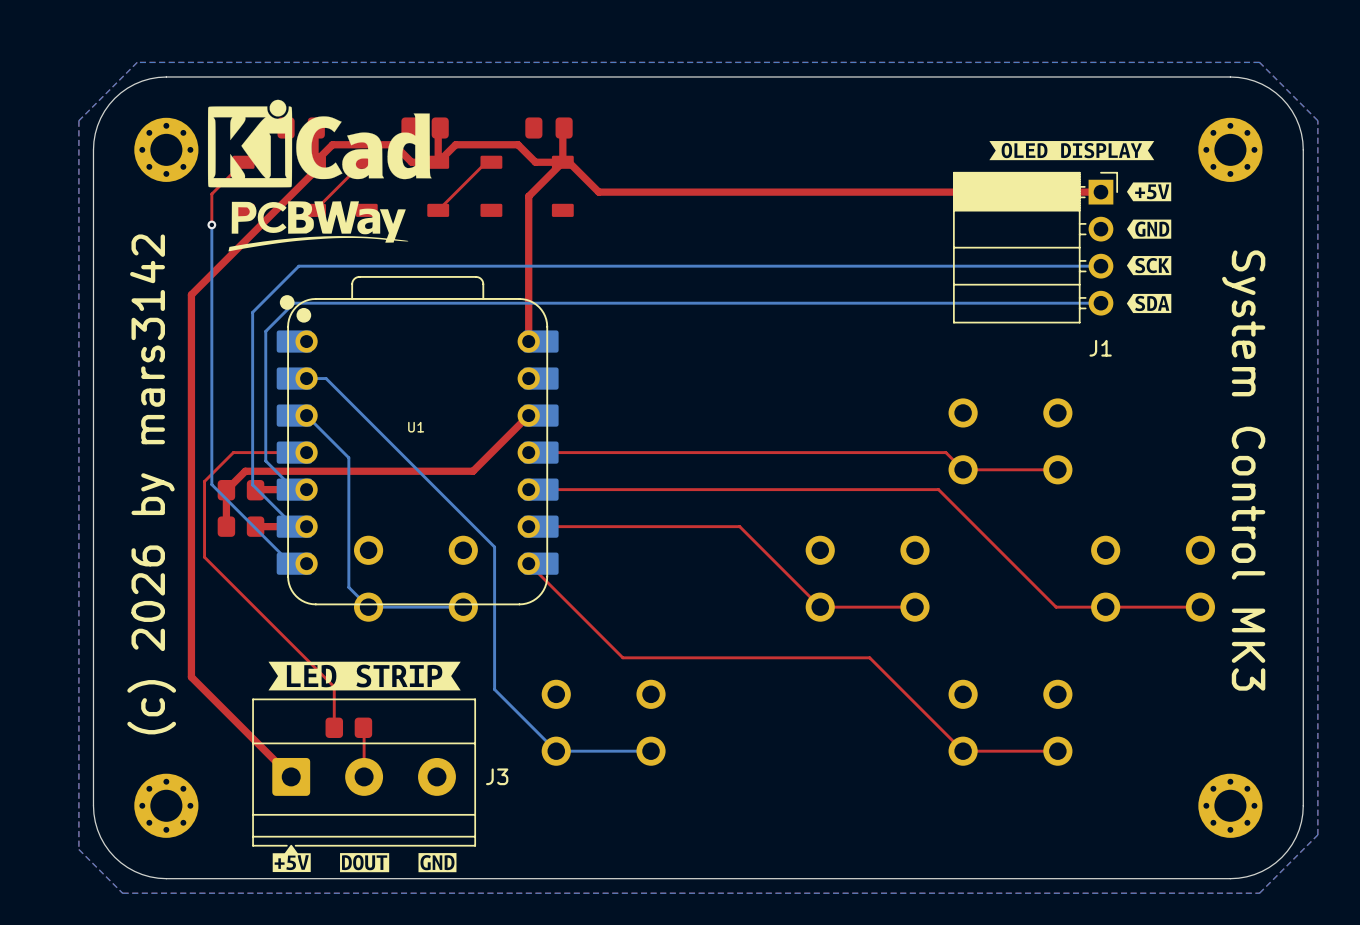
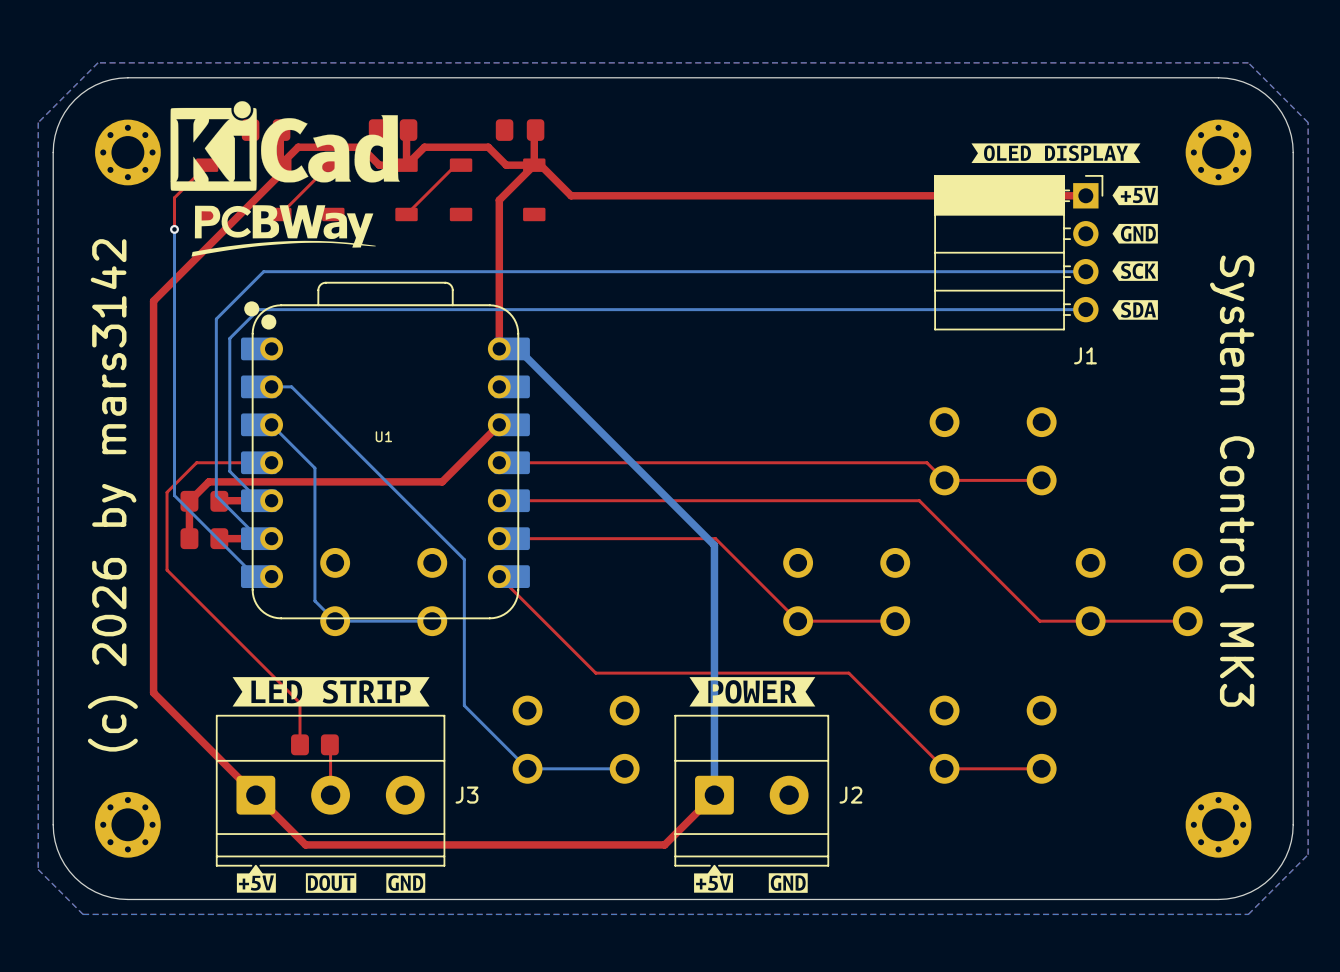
bottom track: none -> (517, 348) (714, 545) (714, 795)
drawing: none -> [689, 677, 816, 707]
top track: none -> (714, 795) (664, 844) (305, 844) (255, 795)
J2: none -> (751, 795)
drawing: none -> [694, 873, 734, 893]
drawing: none -> [768, 873, 808, 893]

